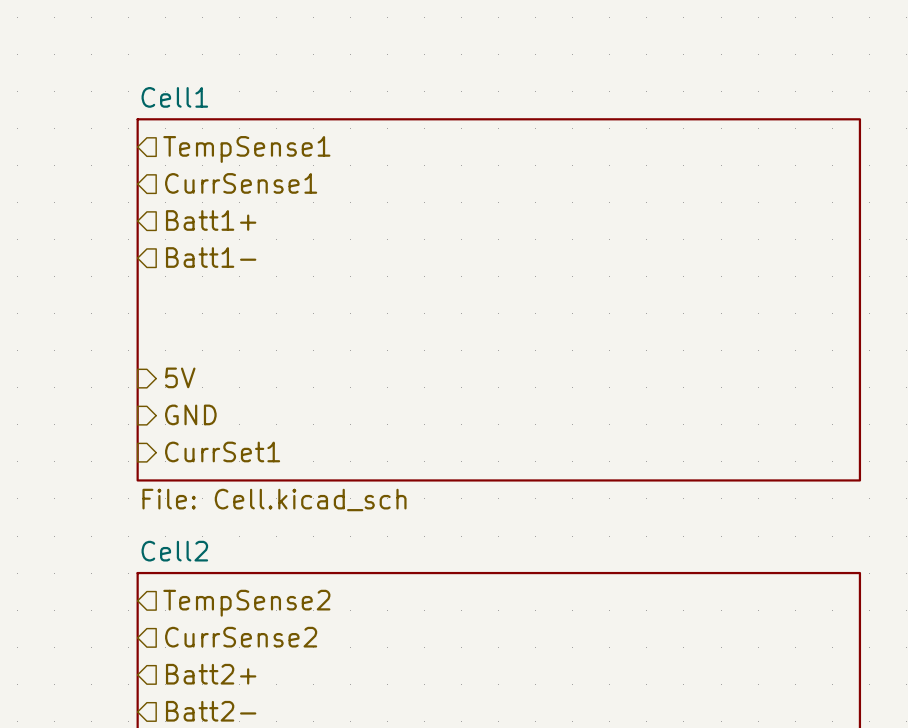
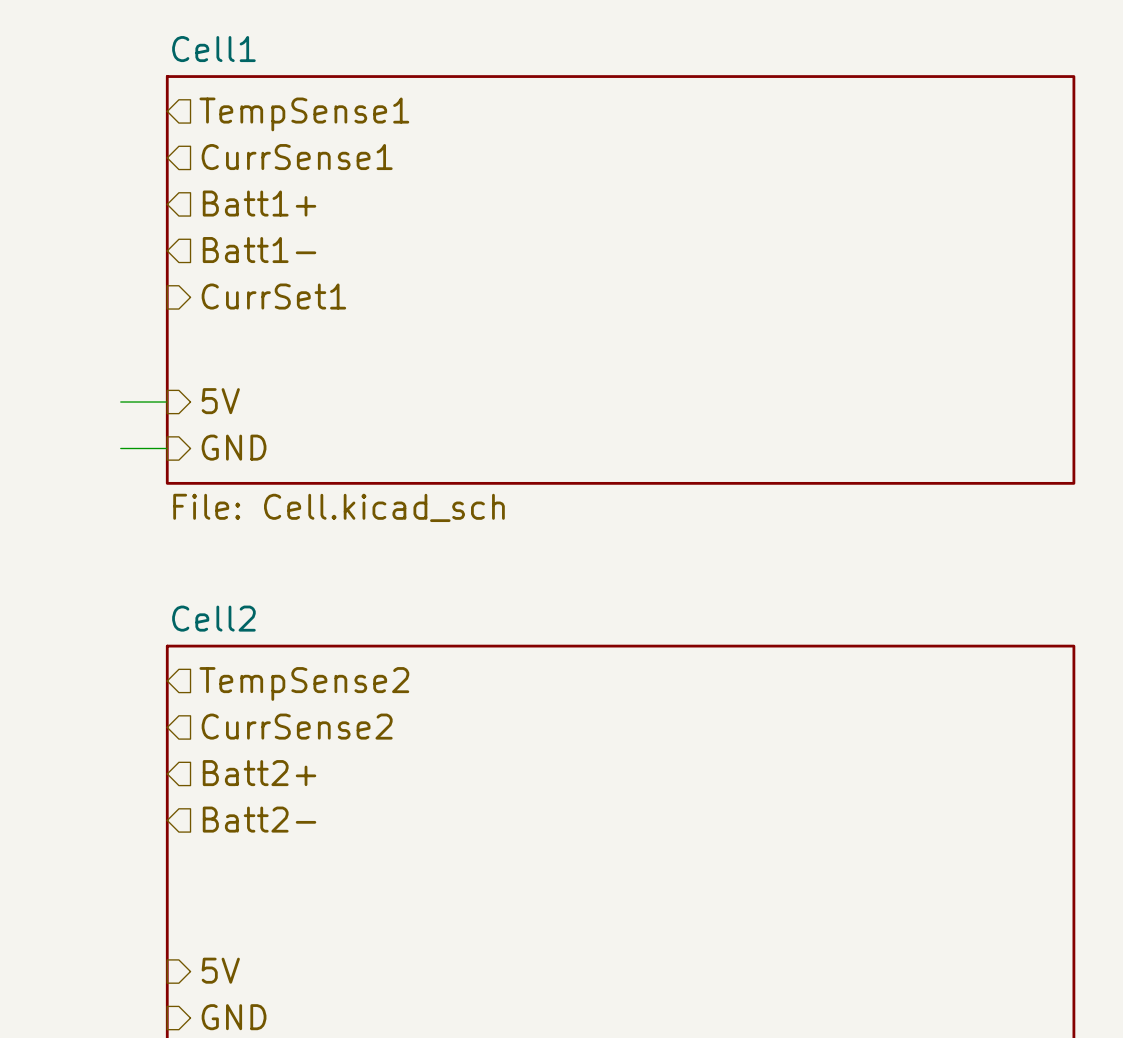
sheet Cell1 shape: [136, 118, 862, 482] -> [165, 75, 1076, 485]
wire: none -> (120, 402) (167, 402)
wire: none -> (120, 448) (167, 448)
hierarchical label position: CurrSet1 (222, 451) -> CurrSet1 (273, 296)

